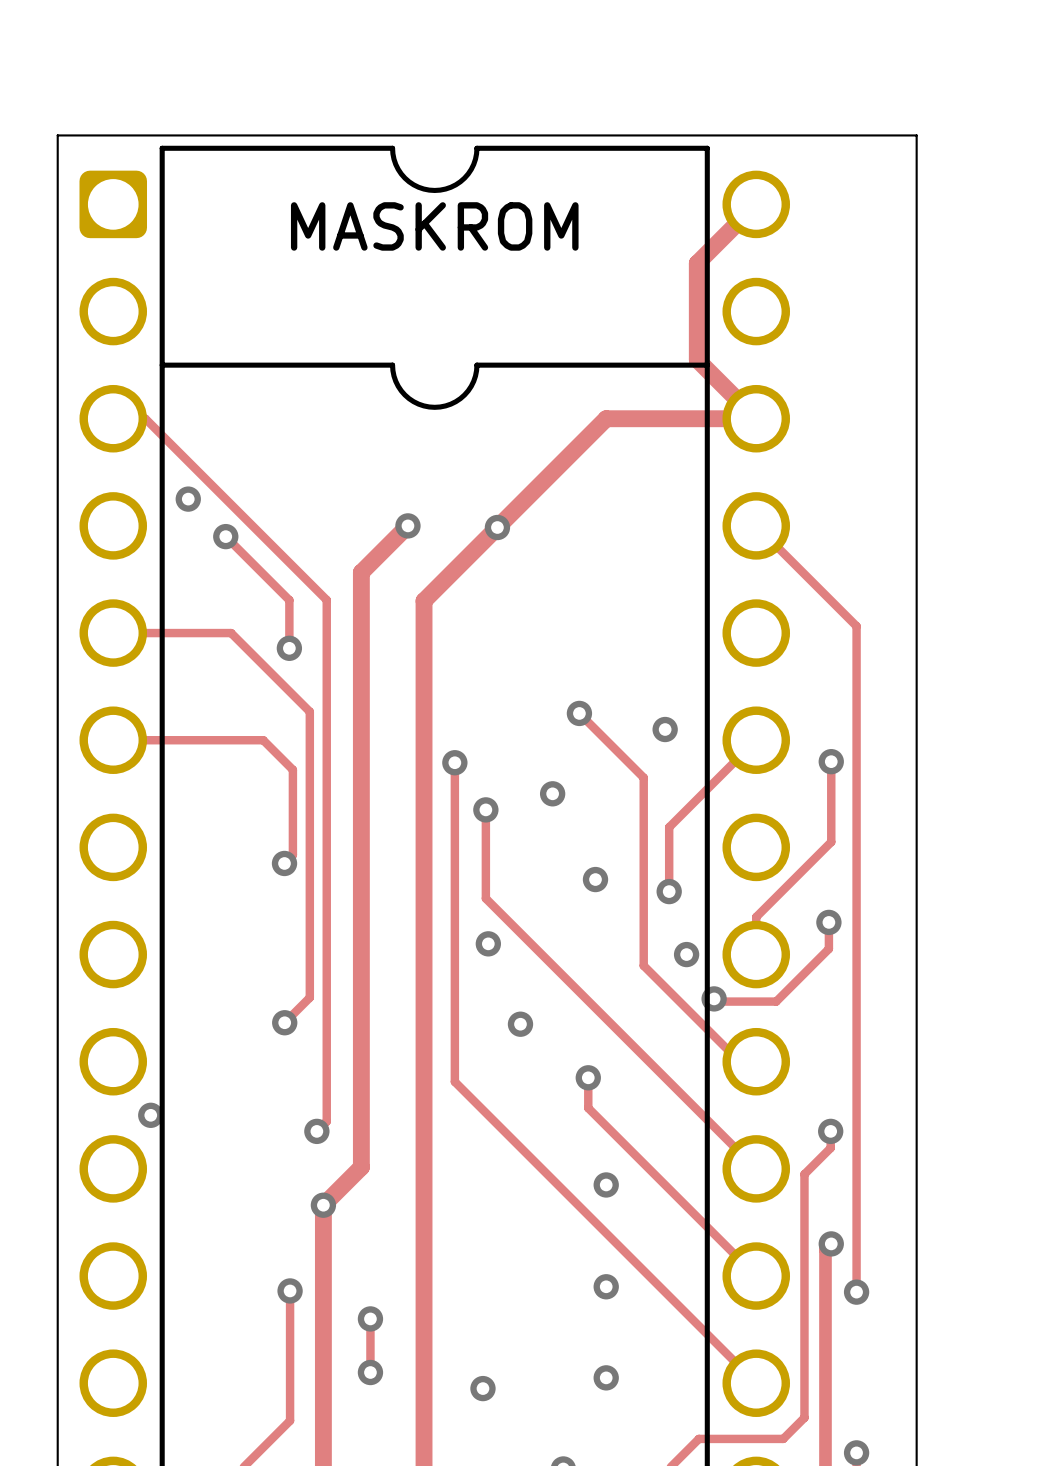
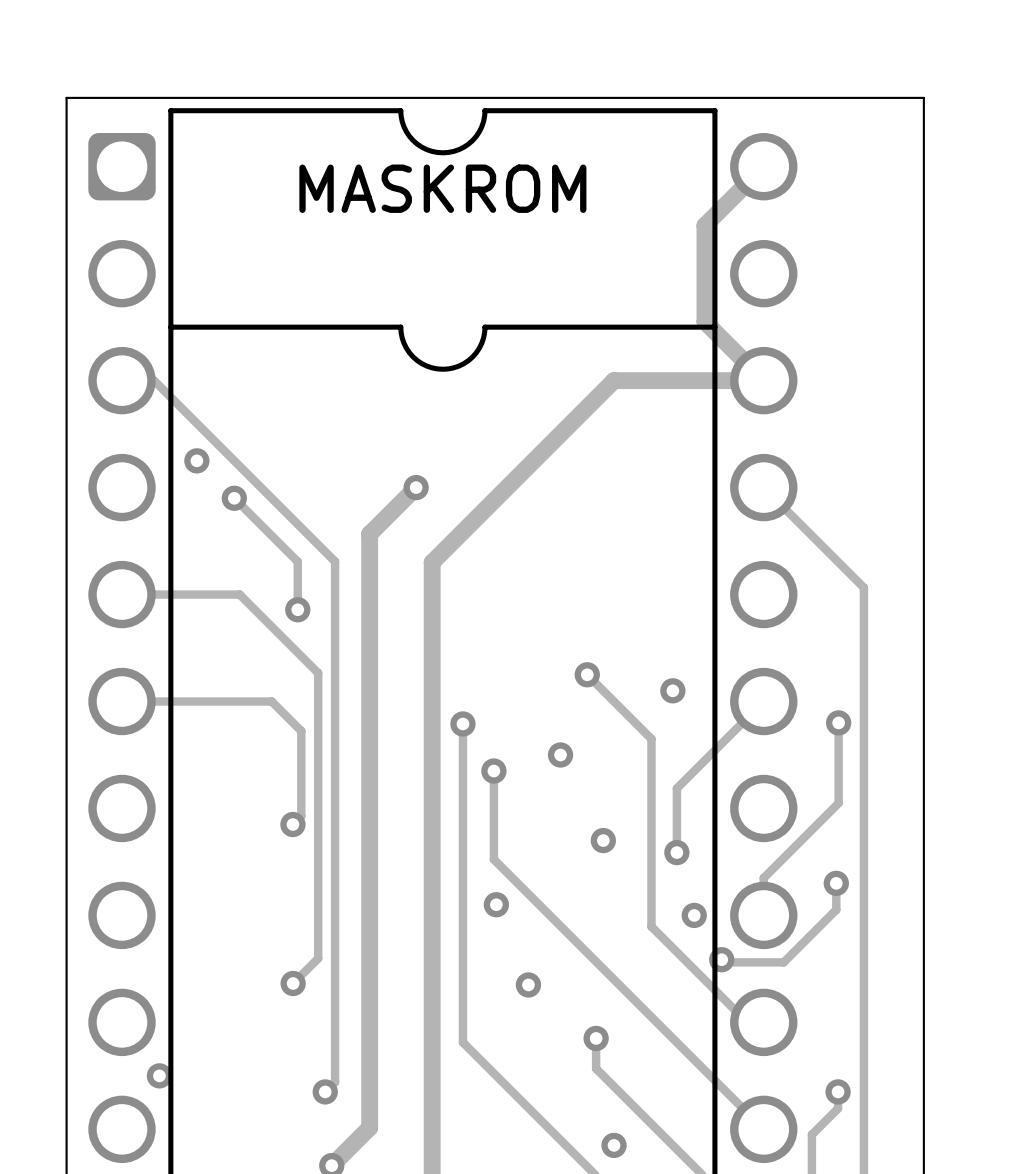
via: (497, 527) -> none

